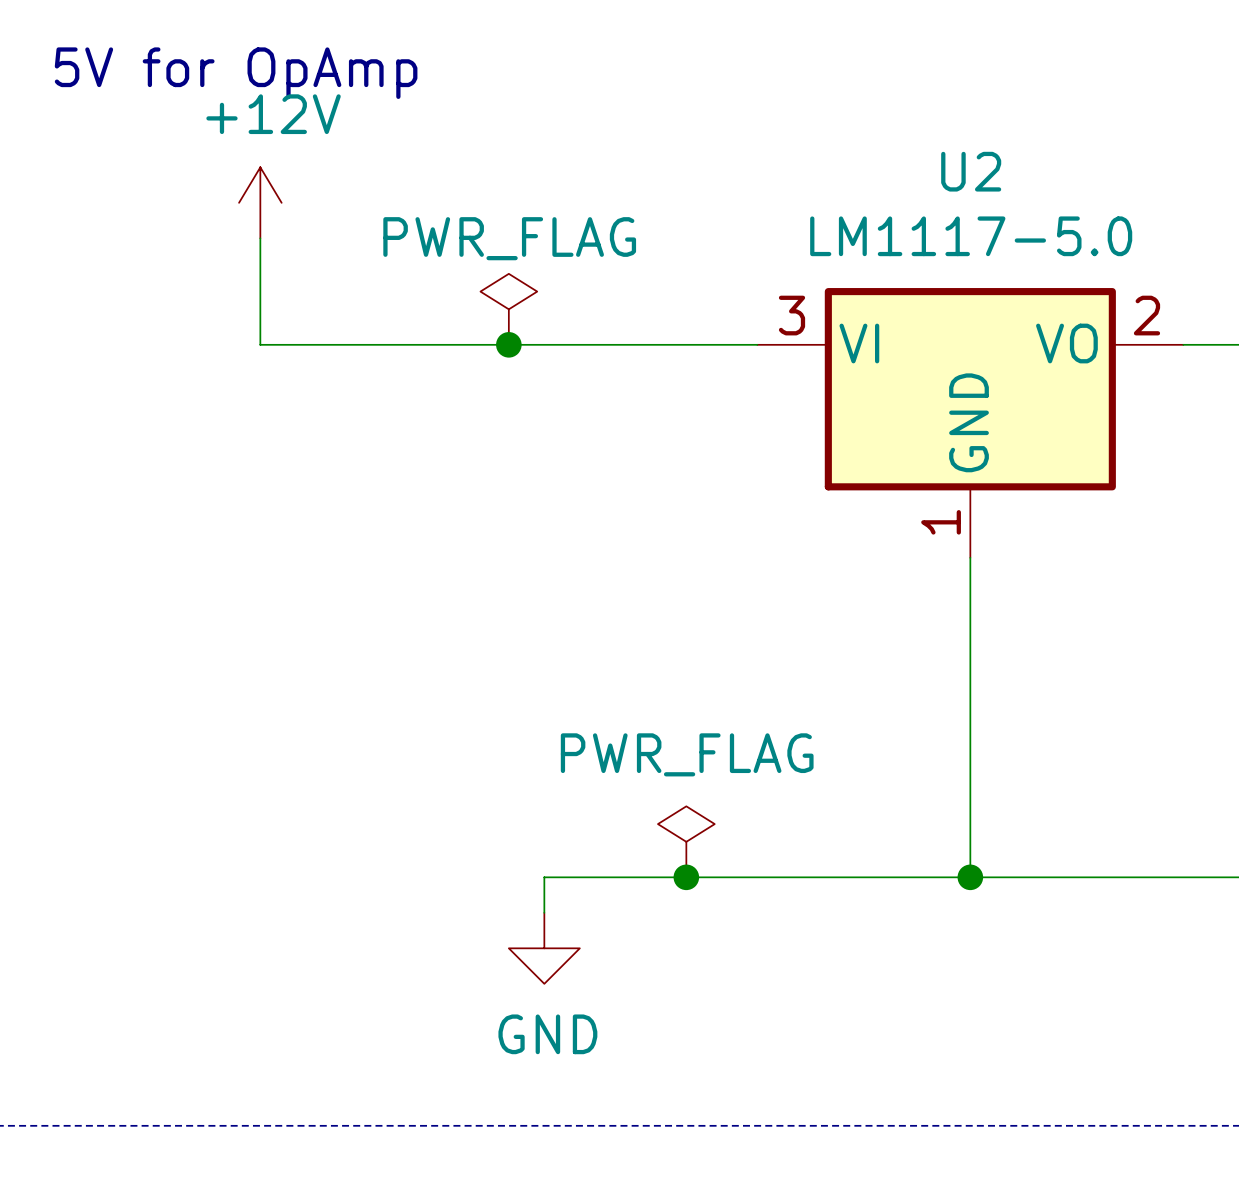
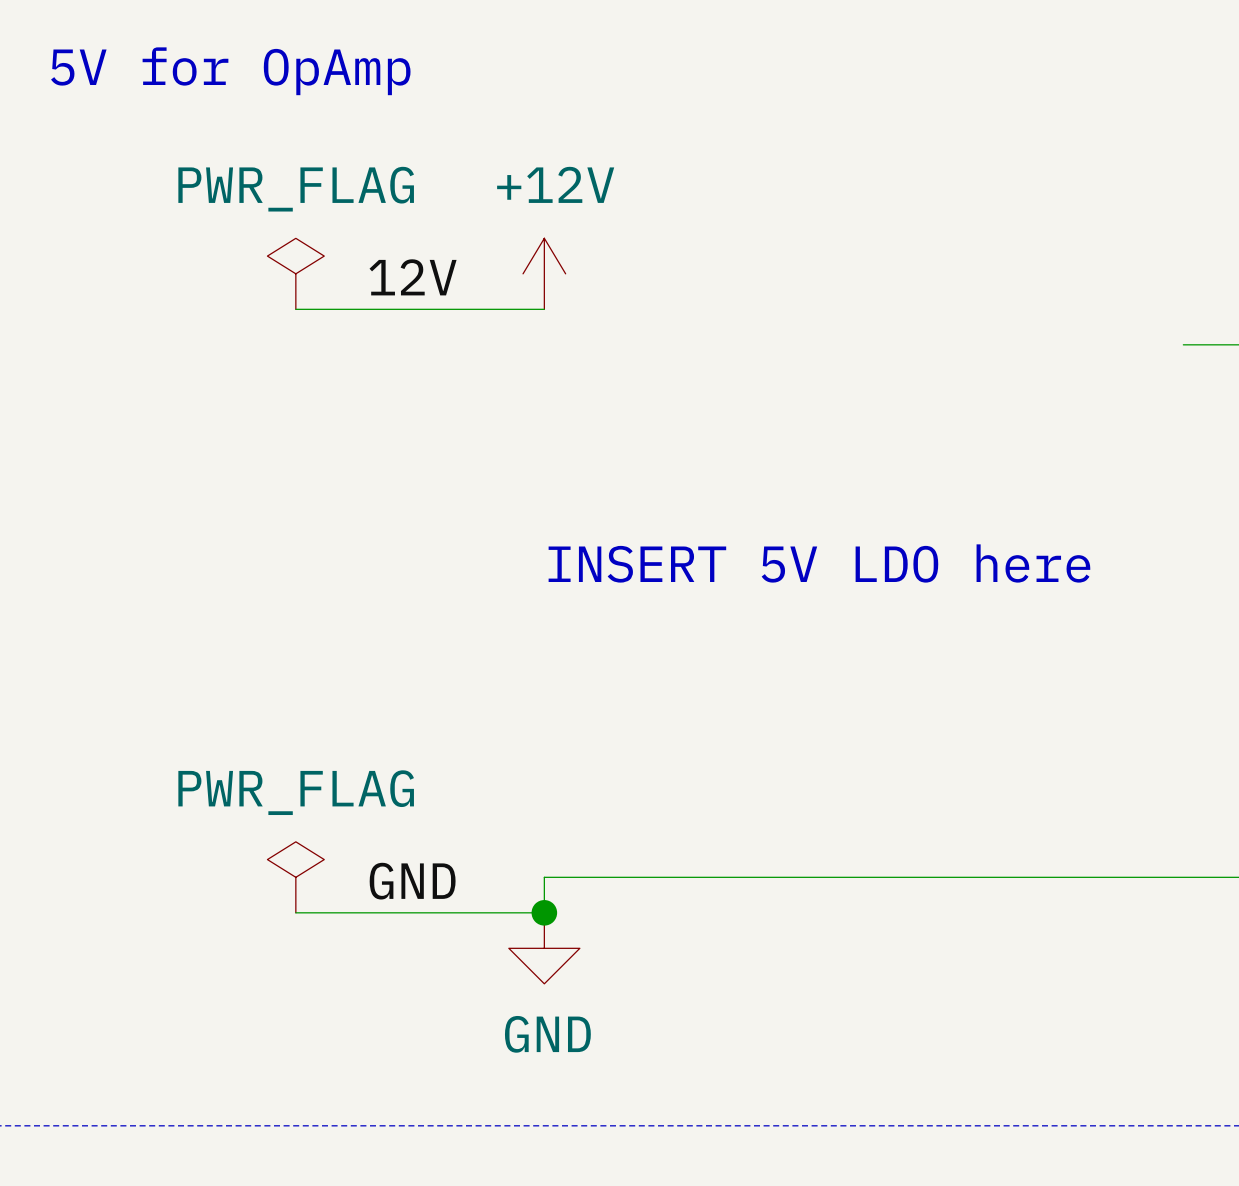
power symbol position: +12V (260, 202) -> +12V (544, 273)
wire: (260, 238) (260, 344) (757, 344) -> none
power symbol text position: PWR_FLAG (509, 238) -> PWR_FLAG (296, 189)
label: none -> 12V (413, 277)
wire: none -> (295, 309) (544, 309)
power symbol position: PWR_FLAG (508, 309) -> PWR_FLAG (295, 273)
junction: (508, 344) -> none
U2: LM1117-5.0 (970, 422) -> none
wire: (970, 557) (970, 877) -> none
text: none -> INSERT 5V LDO here (819, 563)
power symbol: PWR_FLAG (686, 841) -> none
power symbol: none -> PWR_FLAG (295, 877)
junction position: (686, 877) -> (544, 912)
junction: (970, 877) -> none
label: none -> GND (412, 881)
wire: none -> (295, 912) (544, 912)

